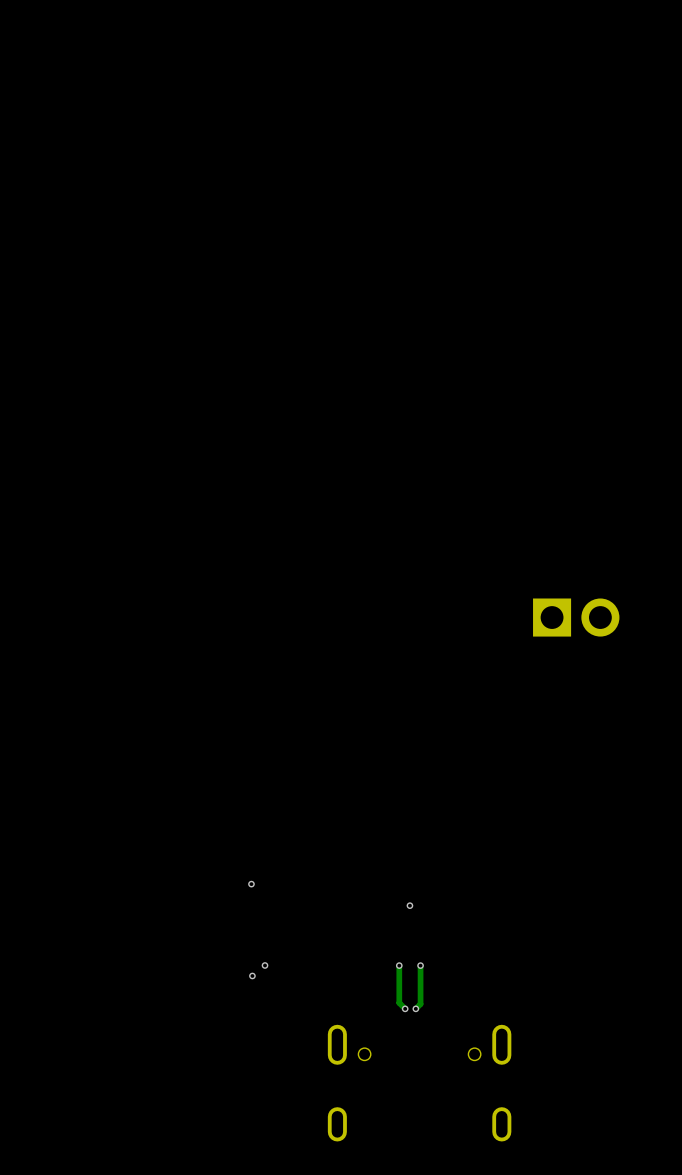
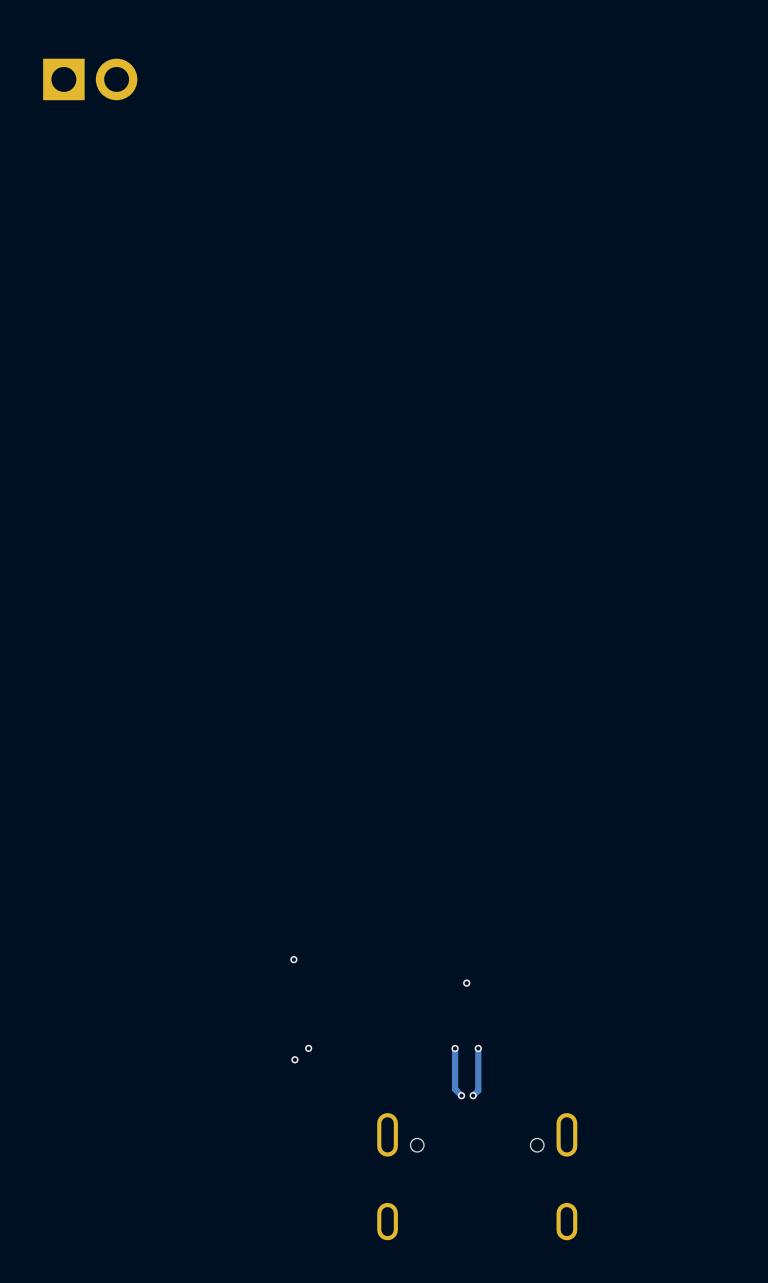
part: none -> (90, 79)
part: (576, 617) -> none

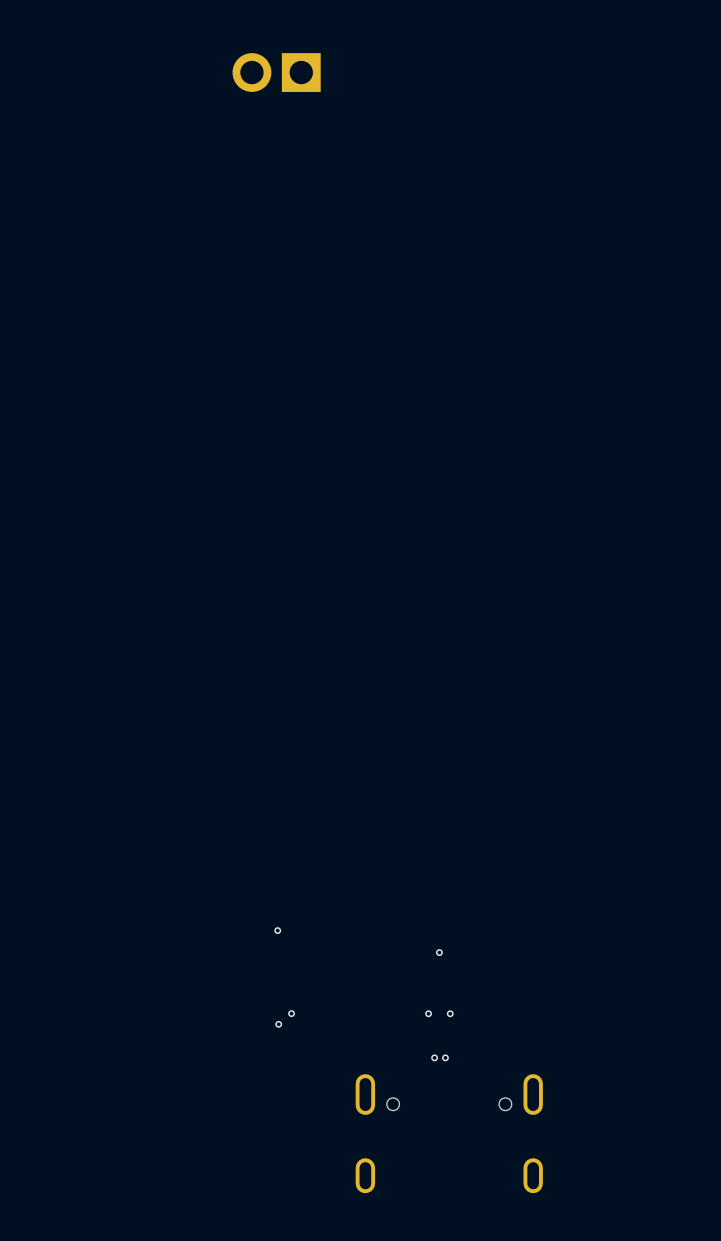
part rotation: 0° (90, 79) -> 180° (276, 72)
part position: (90, 79) -> (276, 72)
track: (455, 1048) (455, 1089) (461, 1095) -> none
track: (478, 1048) (478, 1090) (473, 1095) -> none

